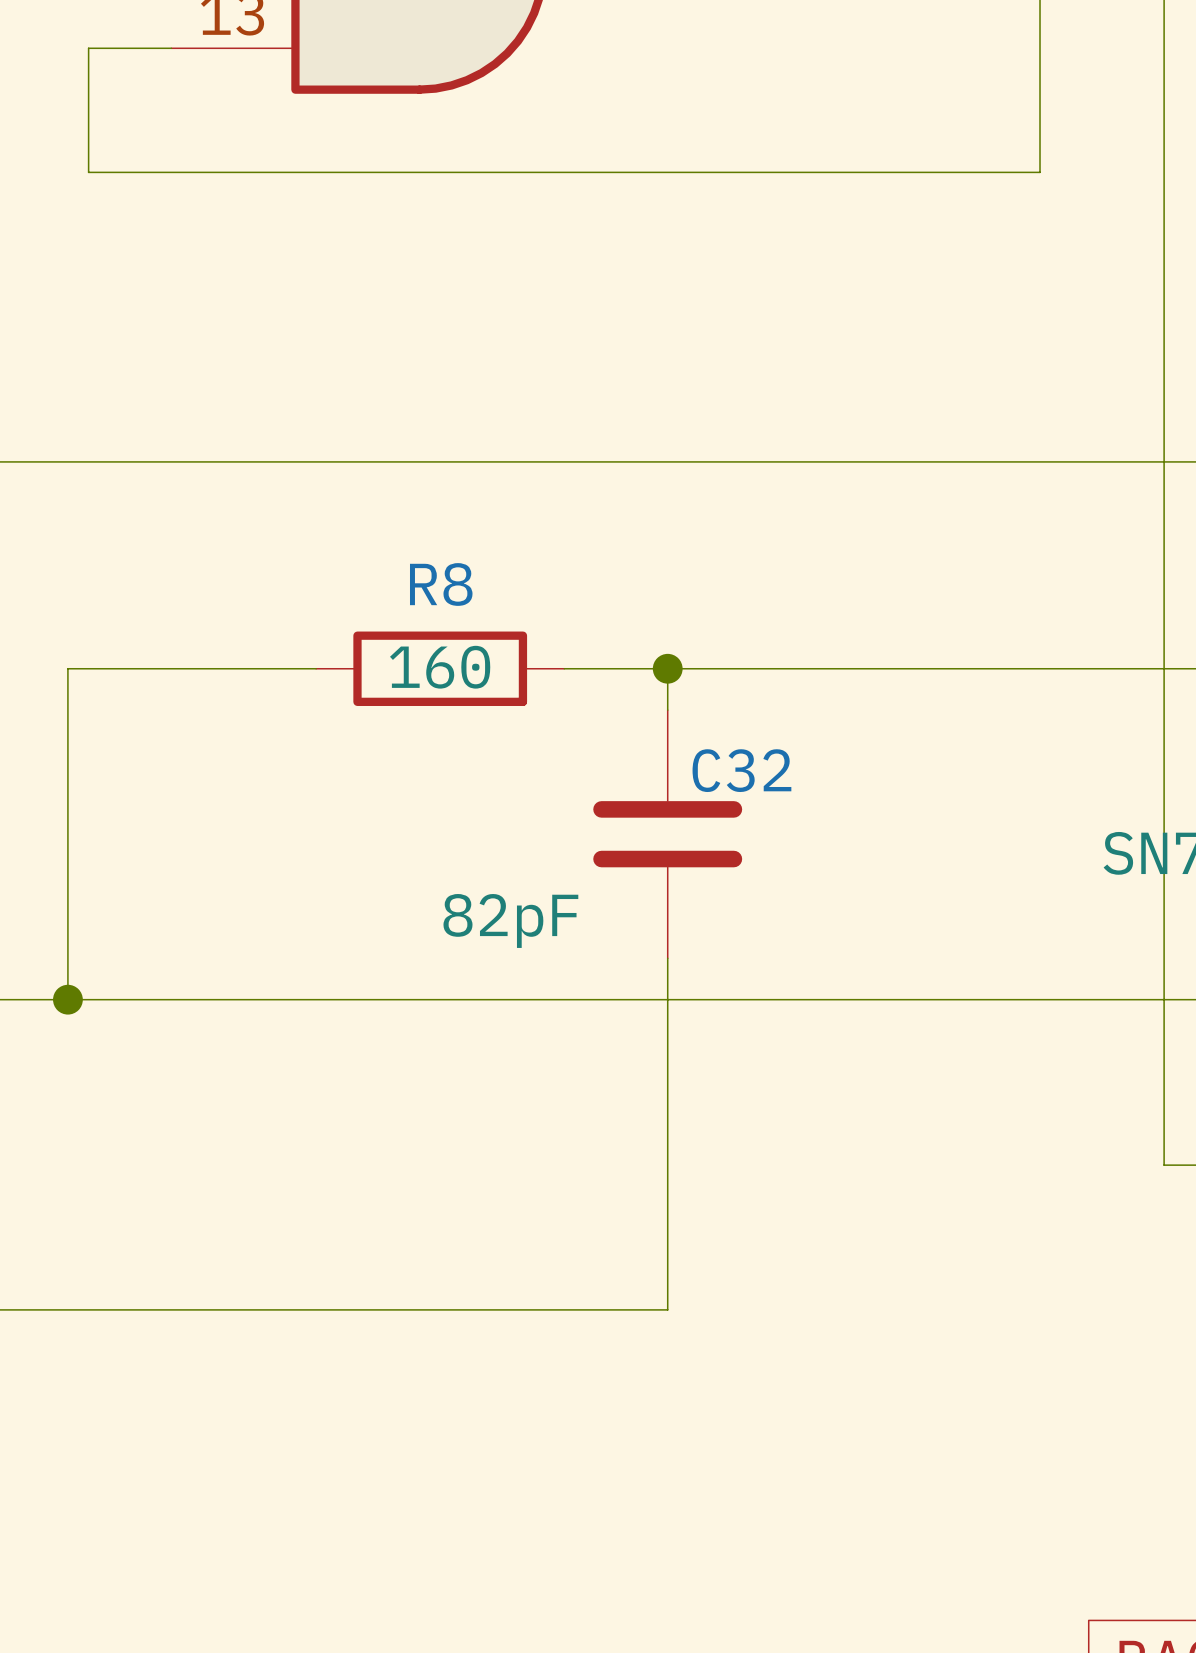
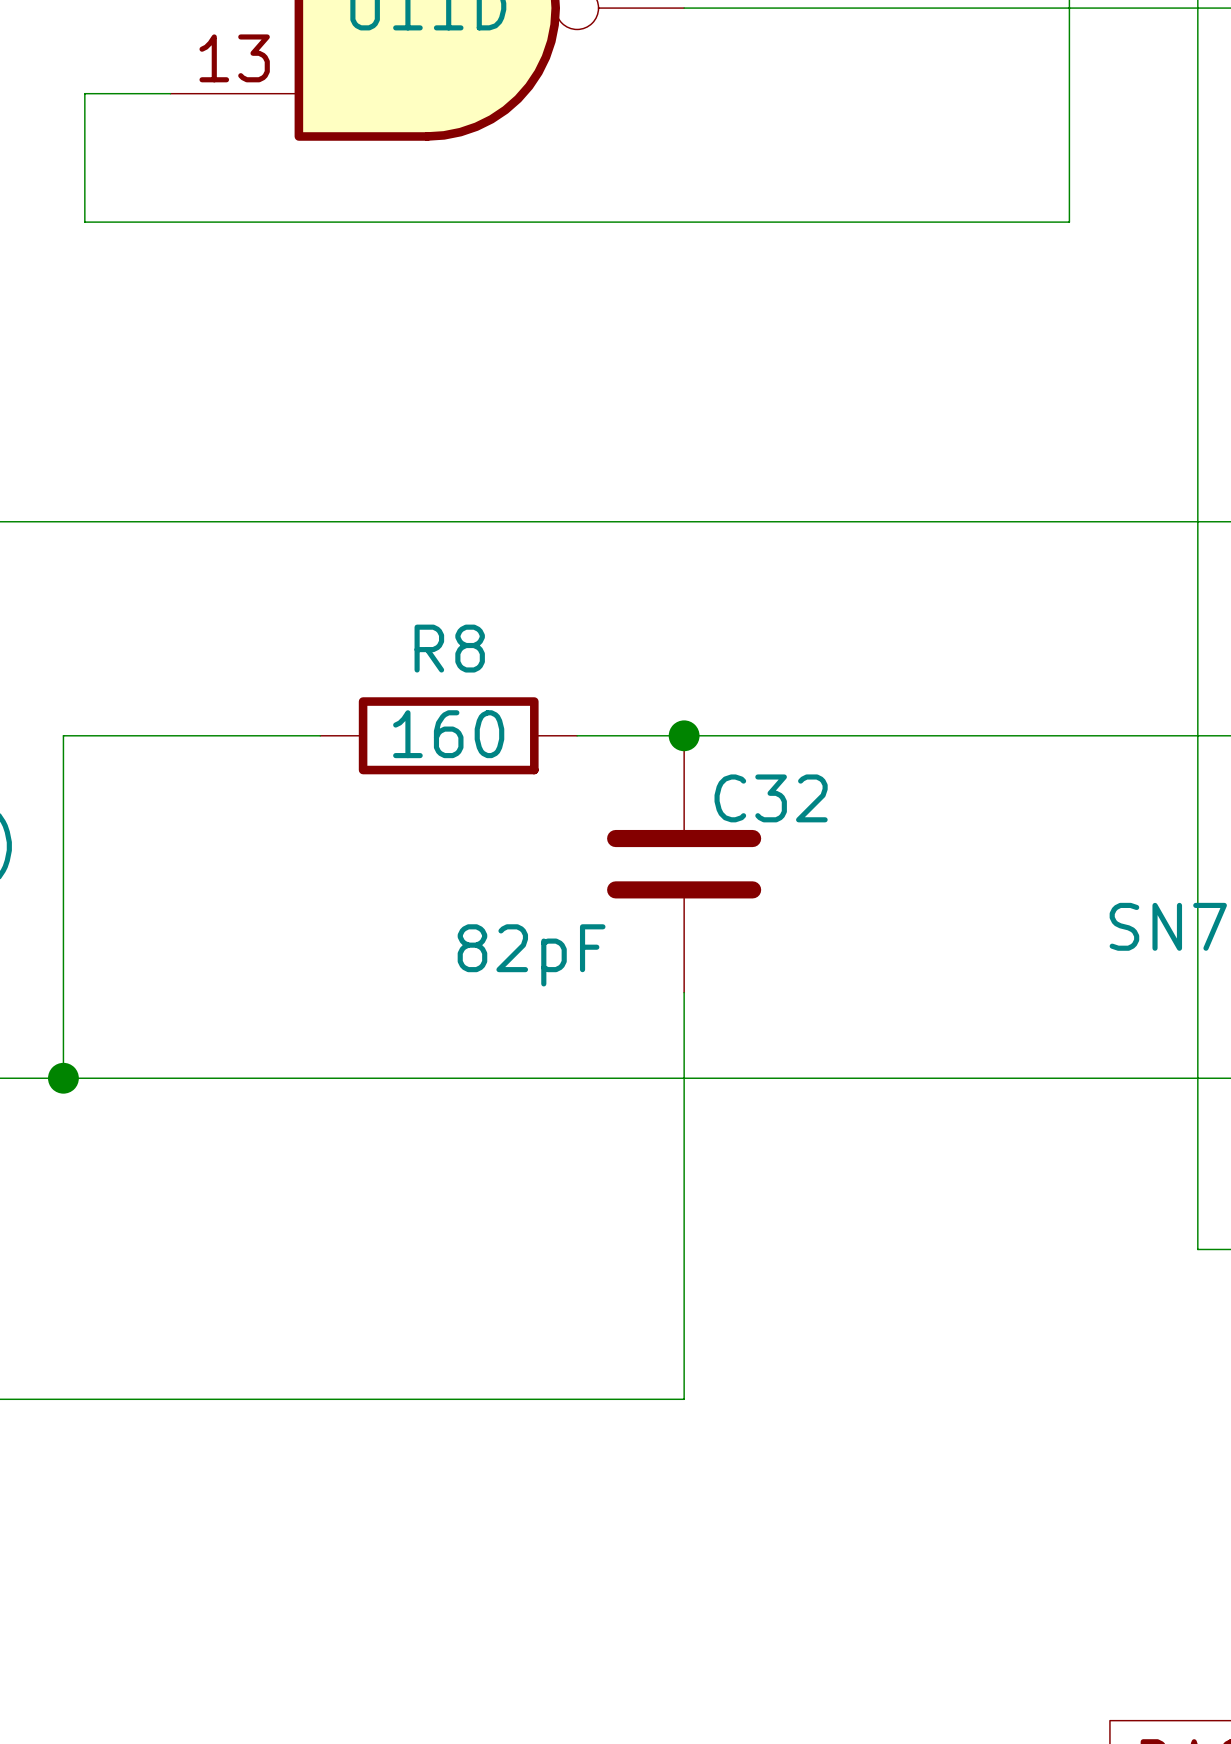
C32 position: (667, 834) -> (684, 864)

